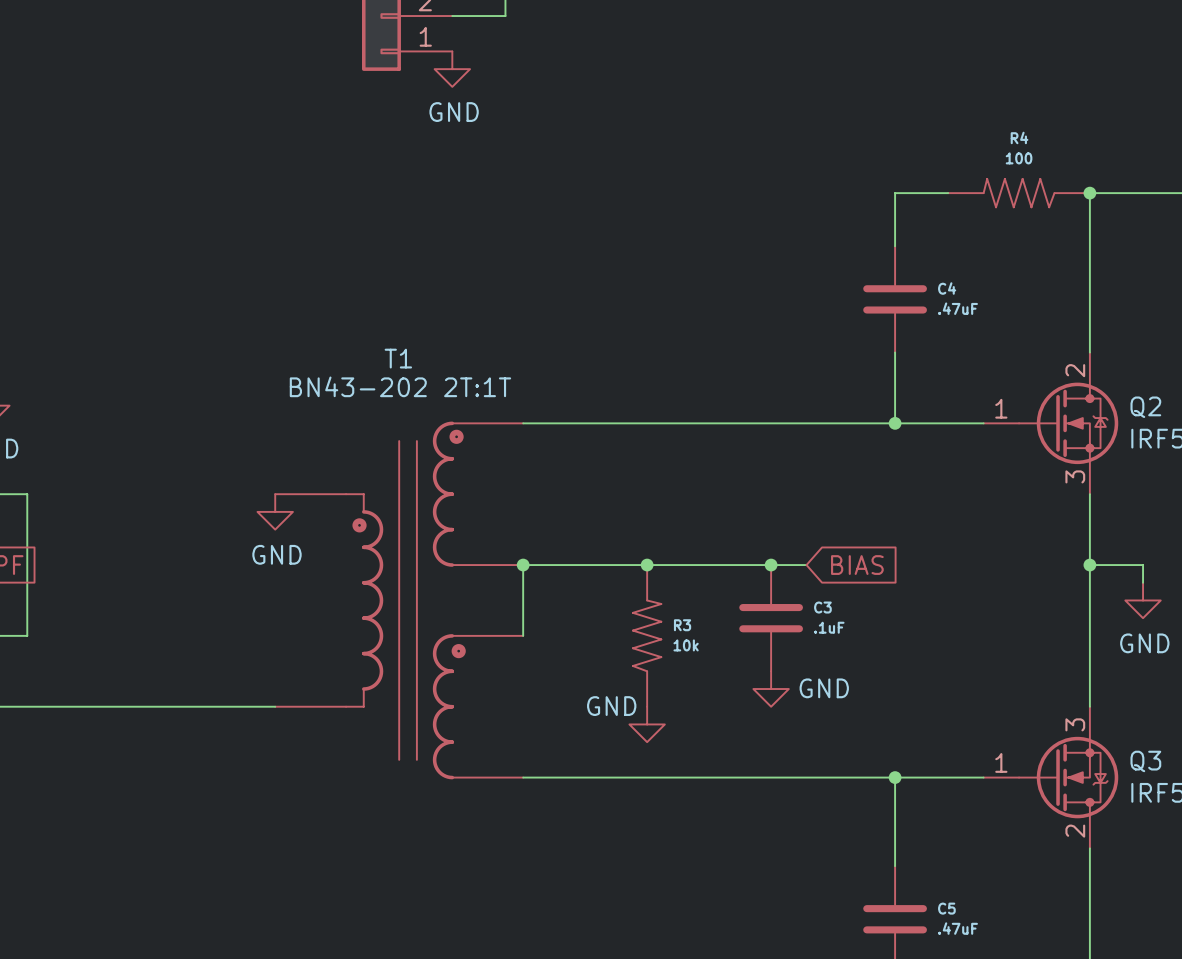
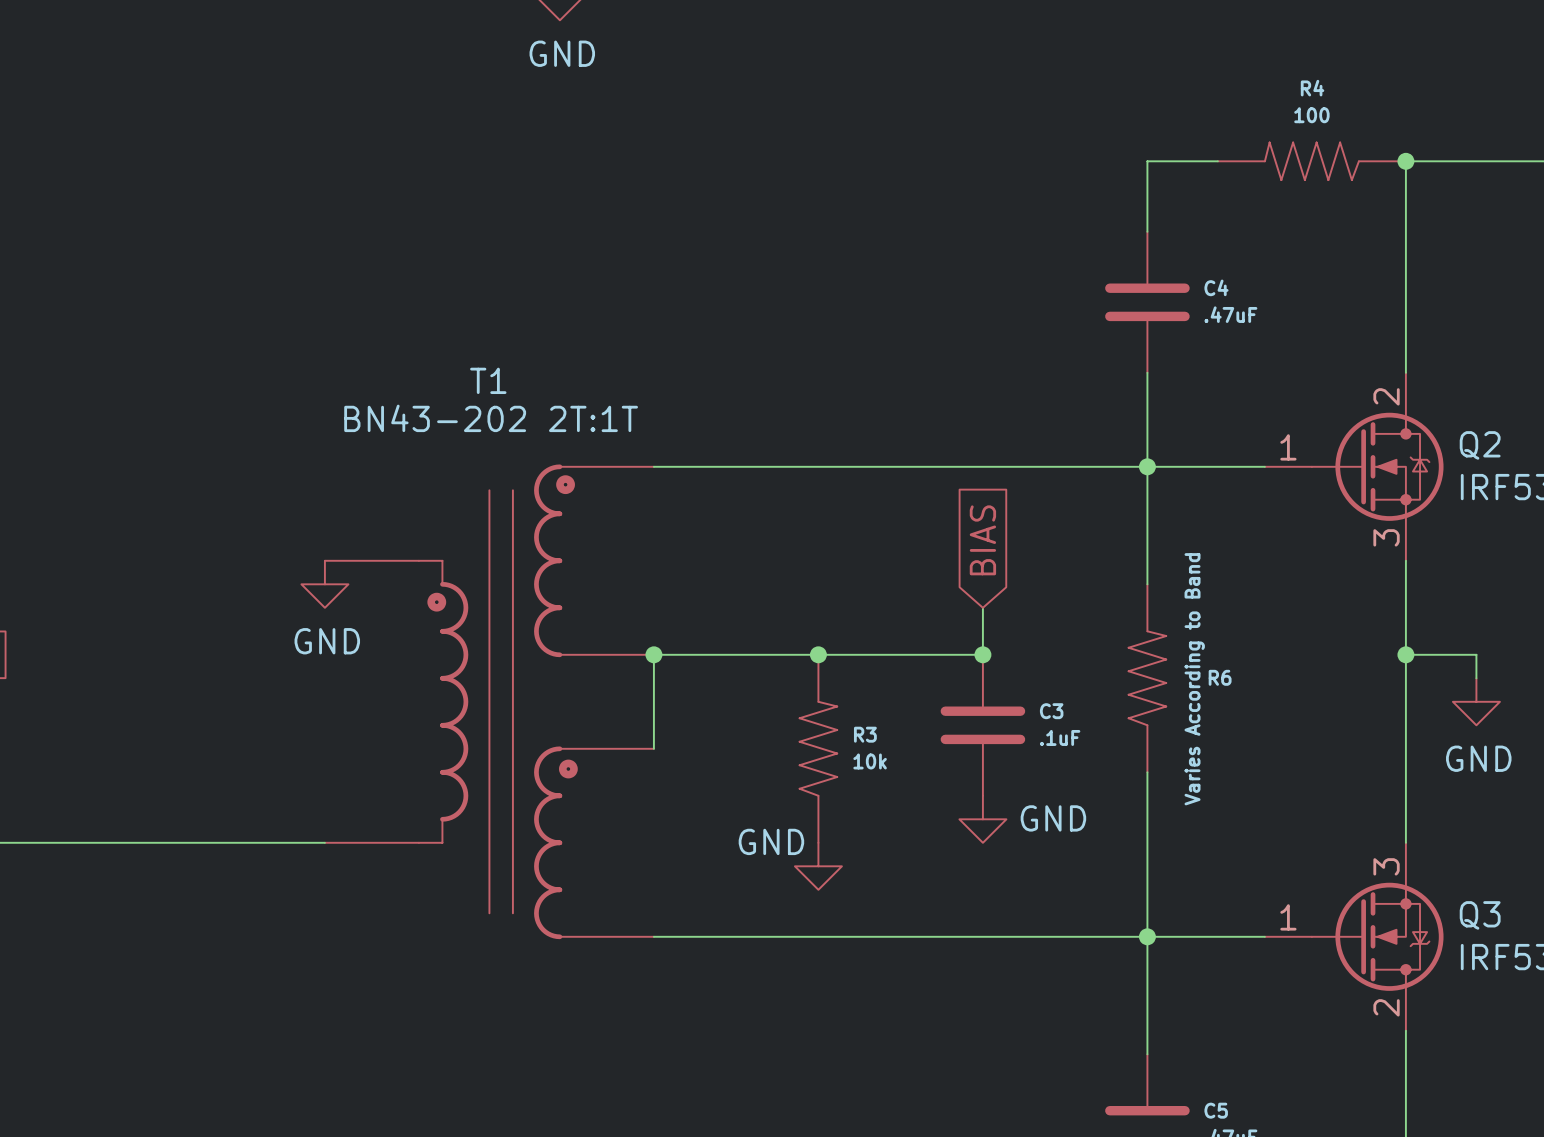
wire: none -> (1147, 466) (1147, 584)
wire: (771, 565) (806, 565) -> (982, 654) (982, 607)
global label rotation: 0° (857, 565) -> 90° counterclockwise (982, 540)
global label position: BIAS (857, 565) -> BIAS (982, 540)
R6: none -> Varies According to Band (1147, 678)
wire: none -> (1147, 772) (1147, 936)

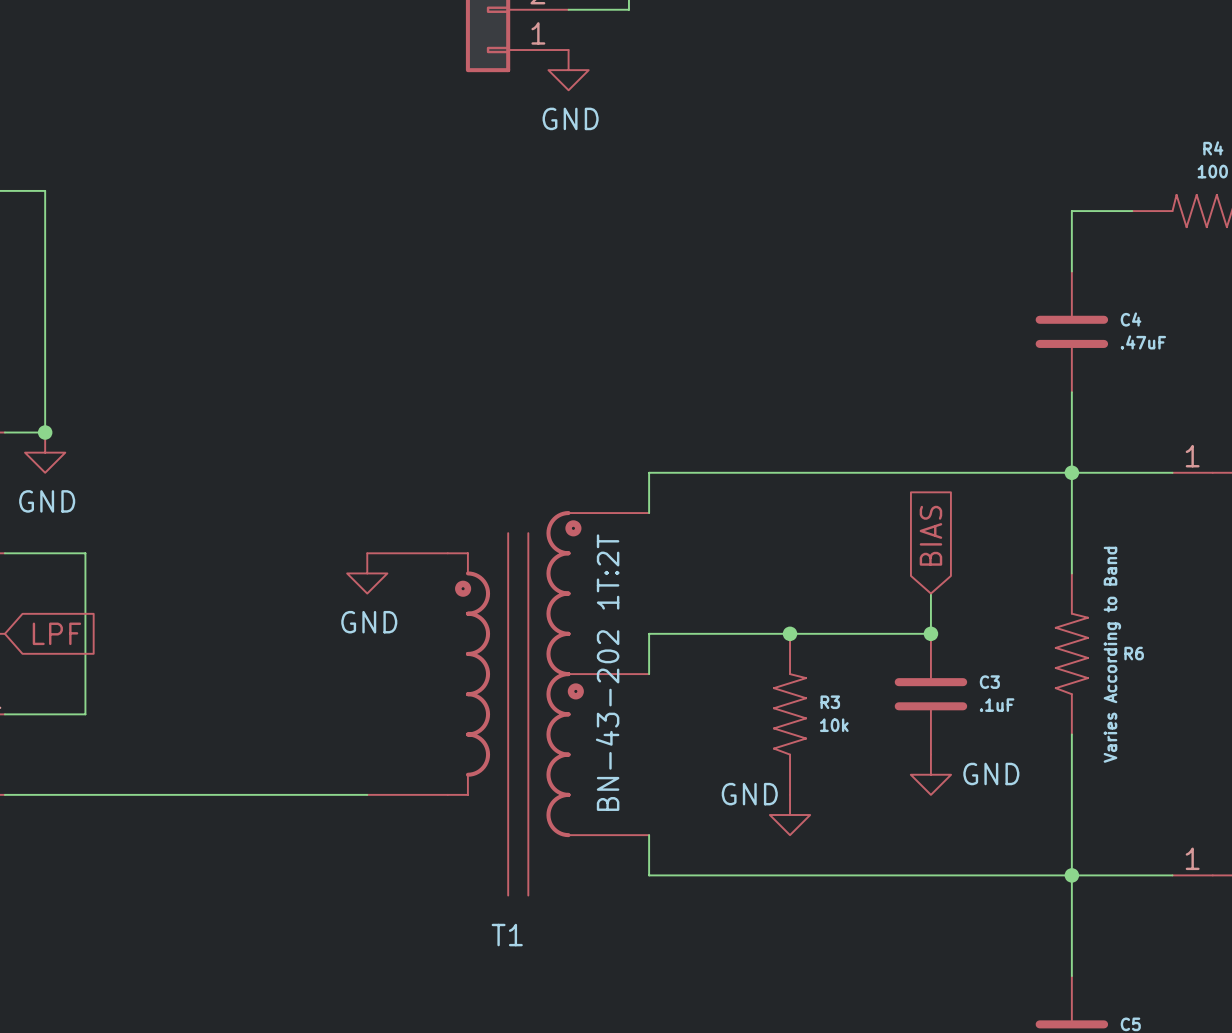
T1 name position: T1 (488, 380) -> T1 (507, 935)
T1 value: BN43-202 2T:1T (491, 418) -> BN-43-202 1T:2T (607, 672)
T1 symbol: [324, 464, 654, 940] -> [367, 511, 650, 896]
wire: none -> (649, 472) (649, 513)
junction: (653, 654) -> none
wire: (653, 701) (653, 748) -> (649, 835) (649, 875)

